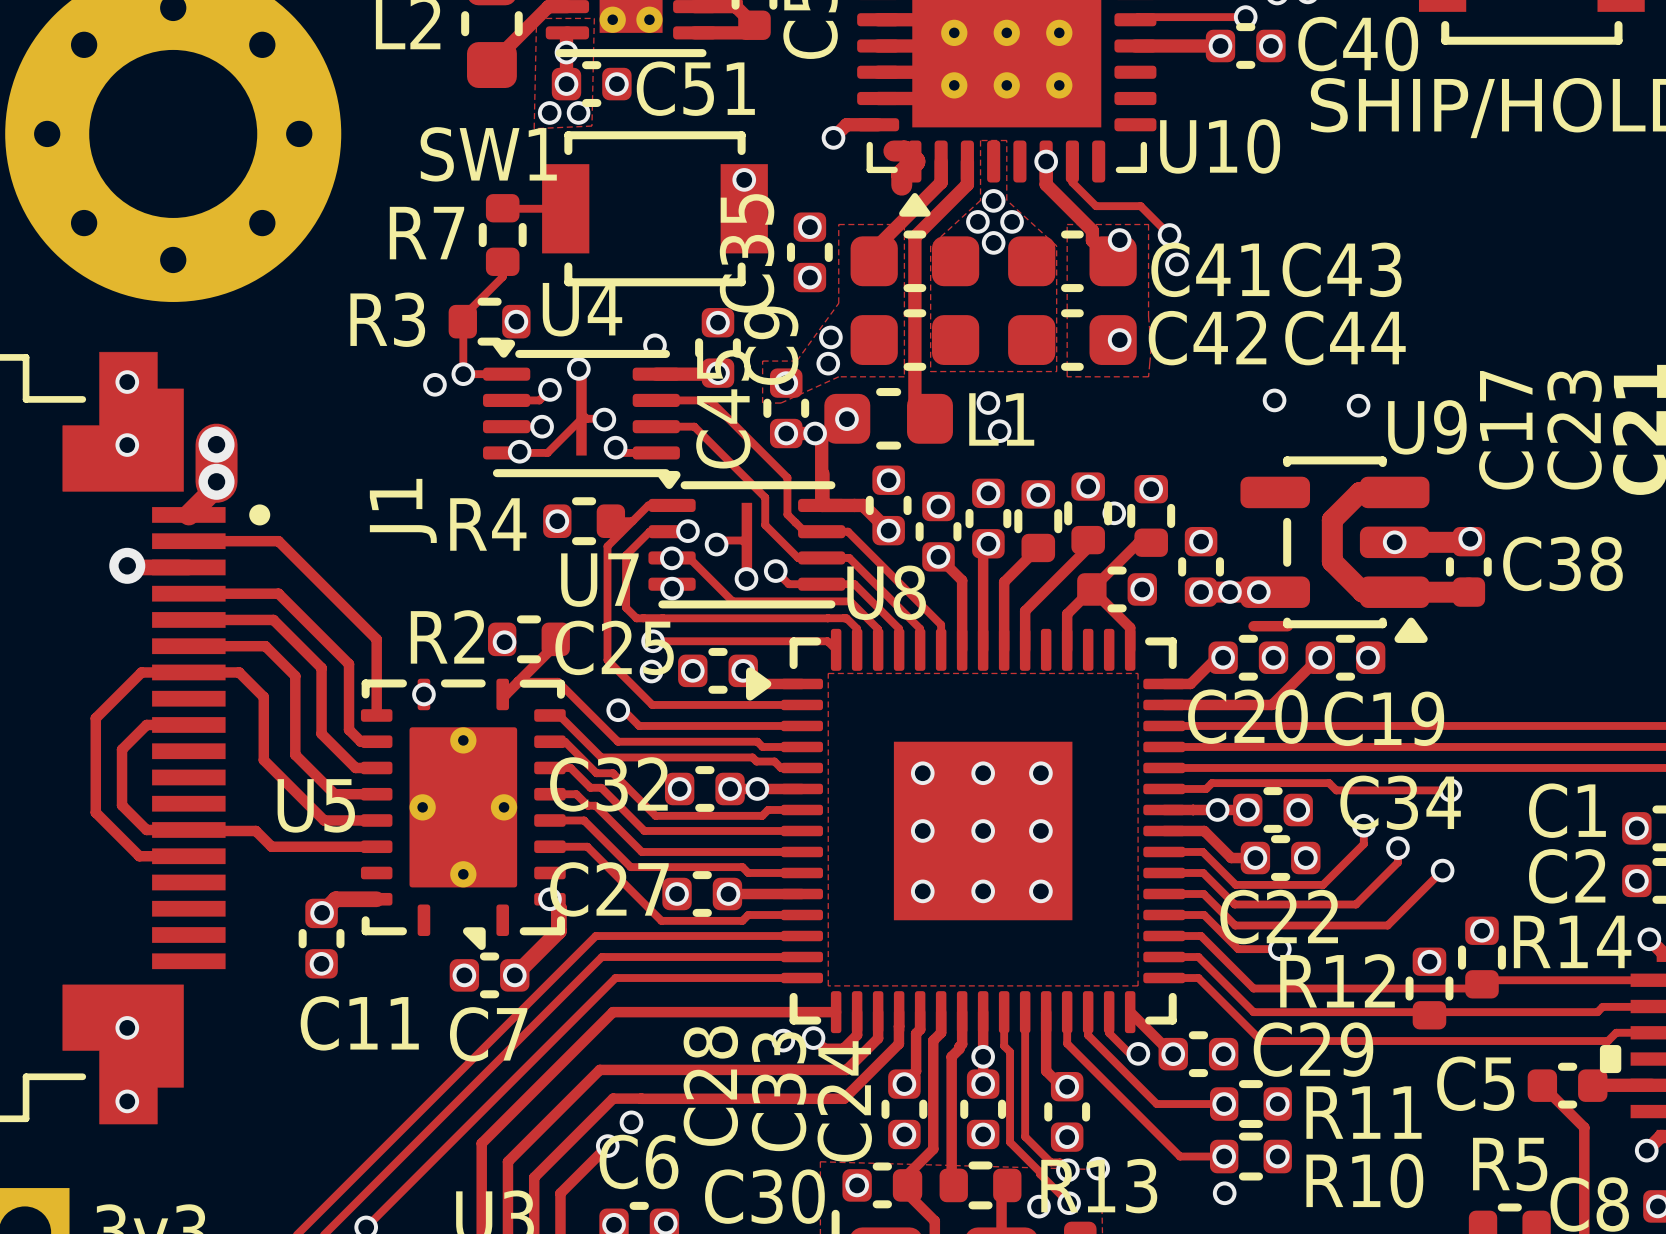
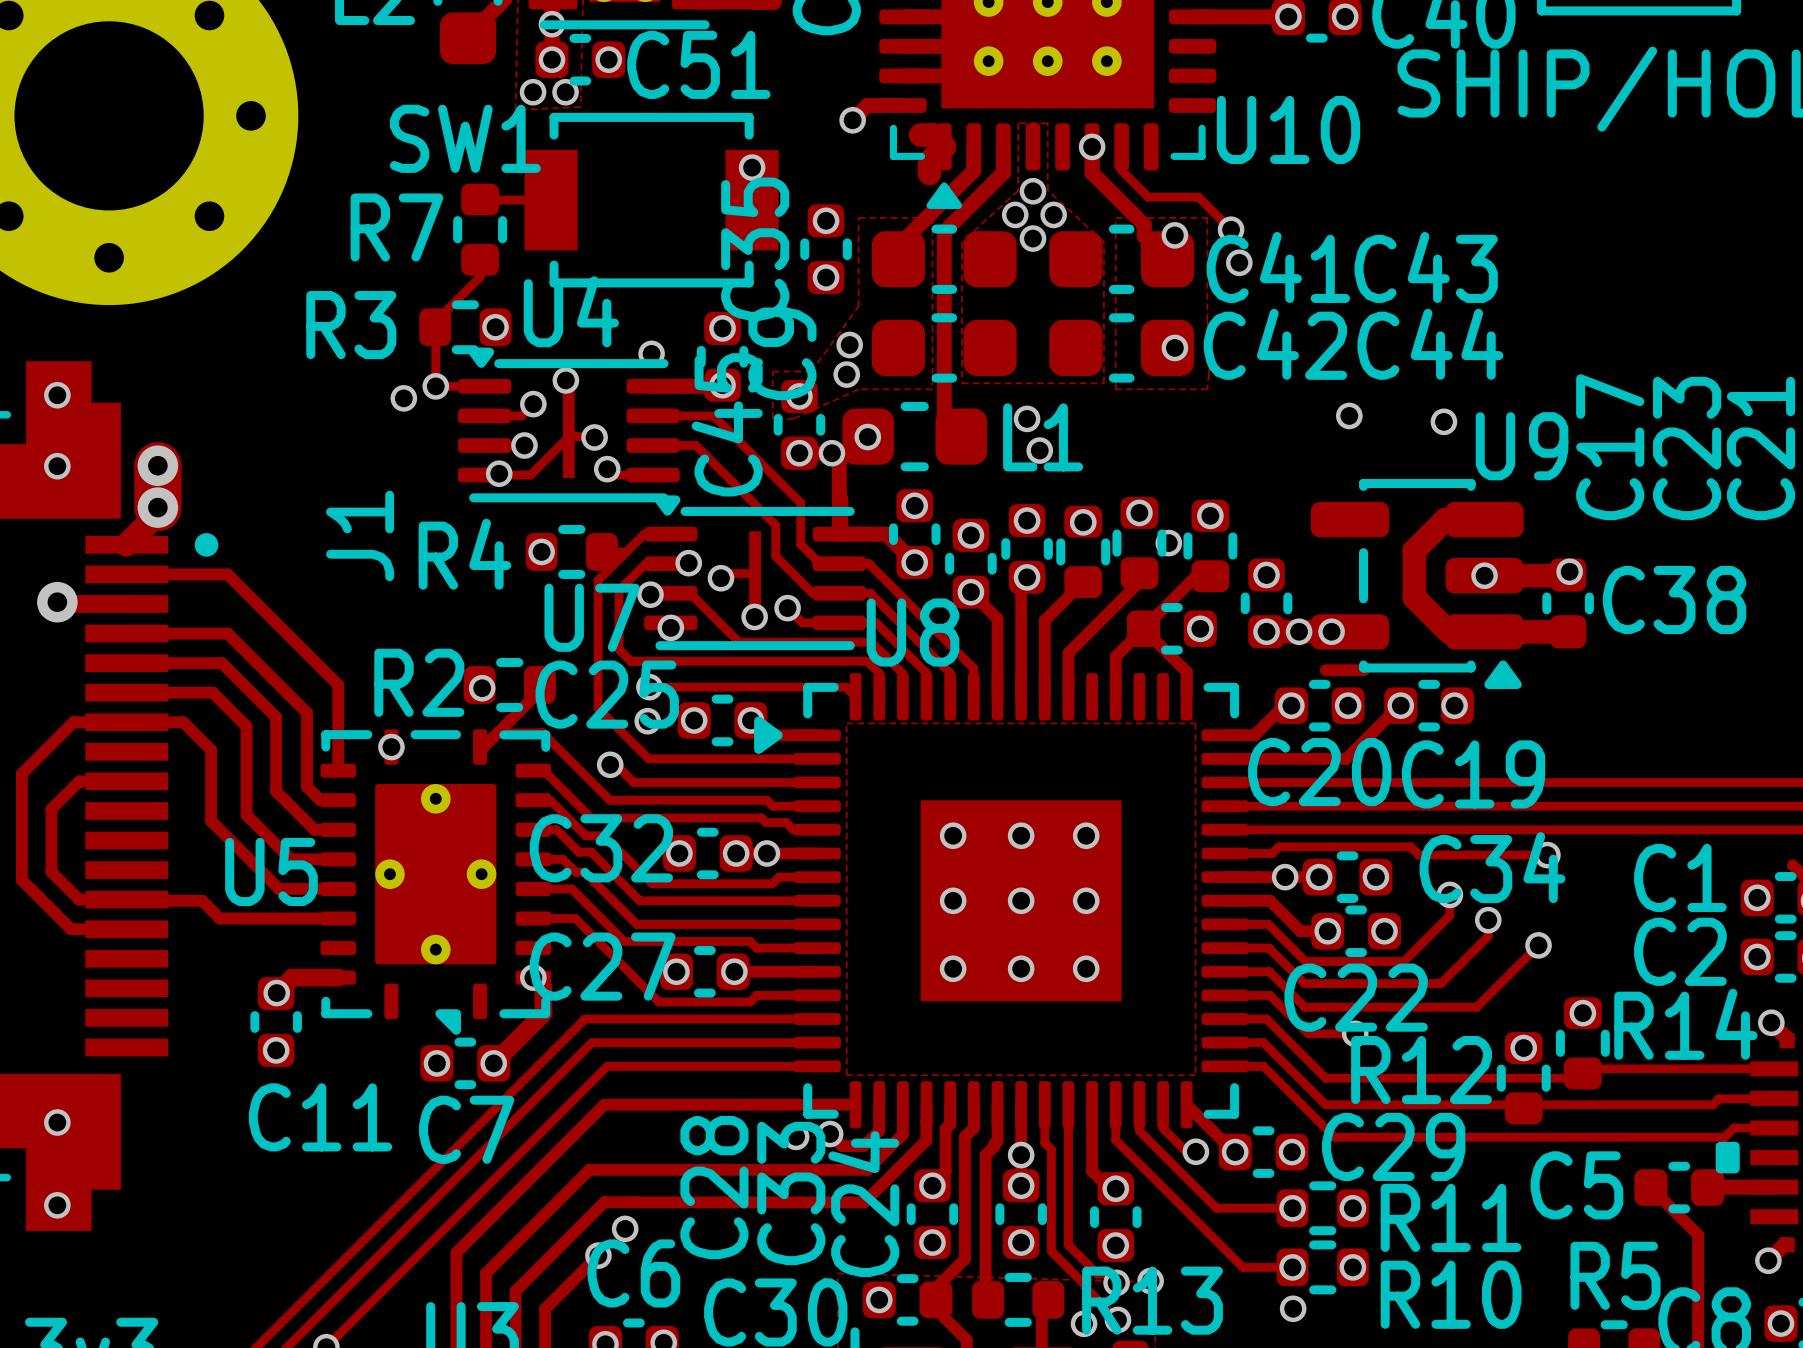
via position: (671, 558) -> (650, 594)

